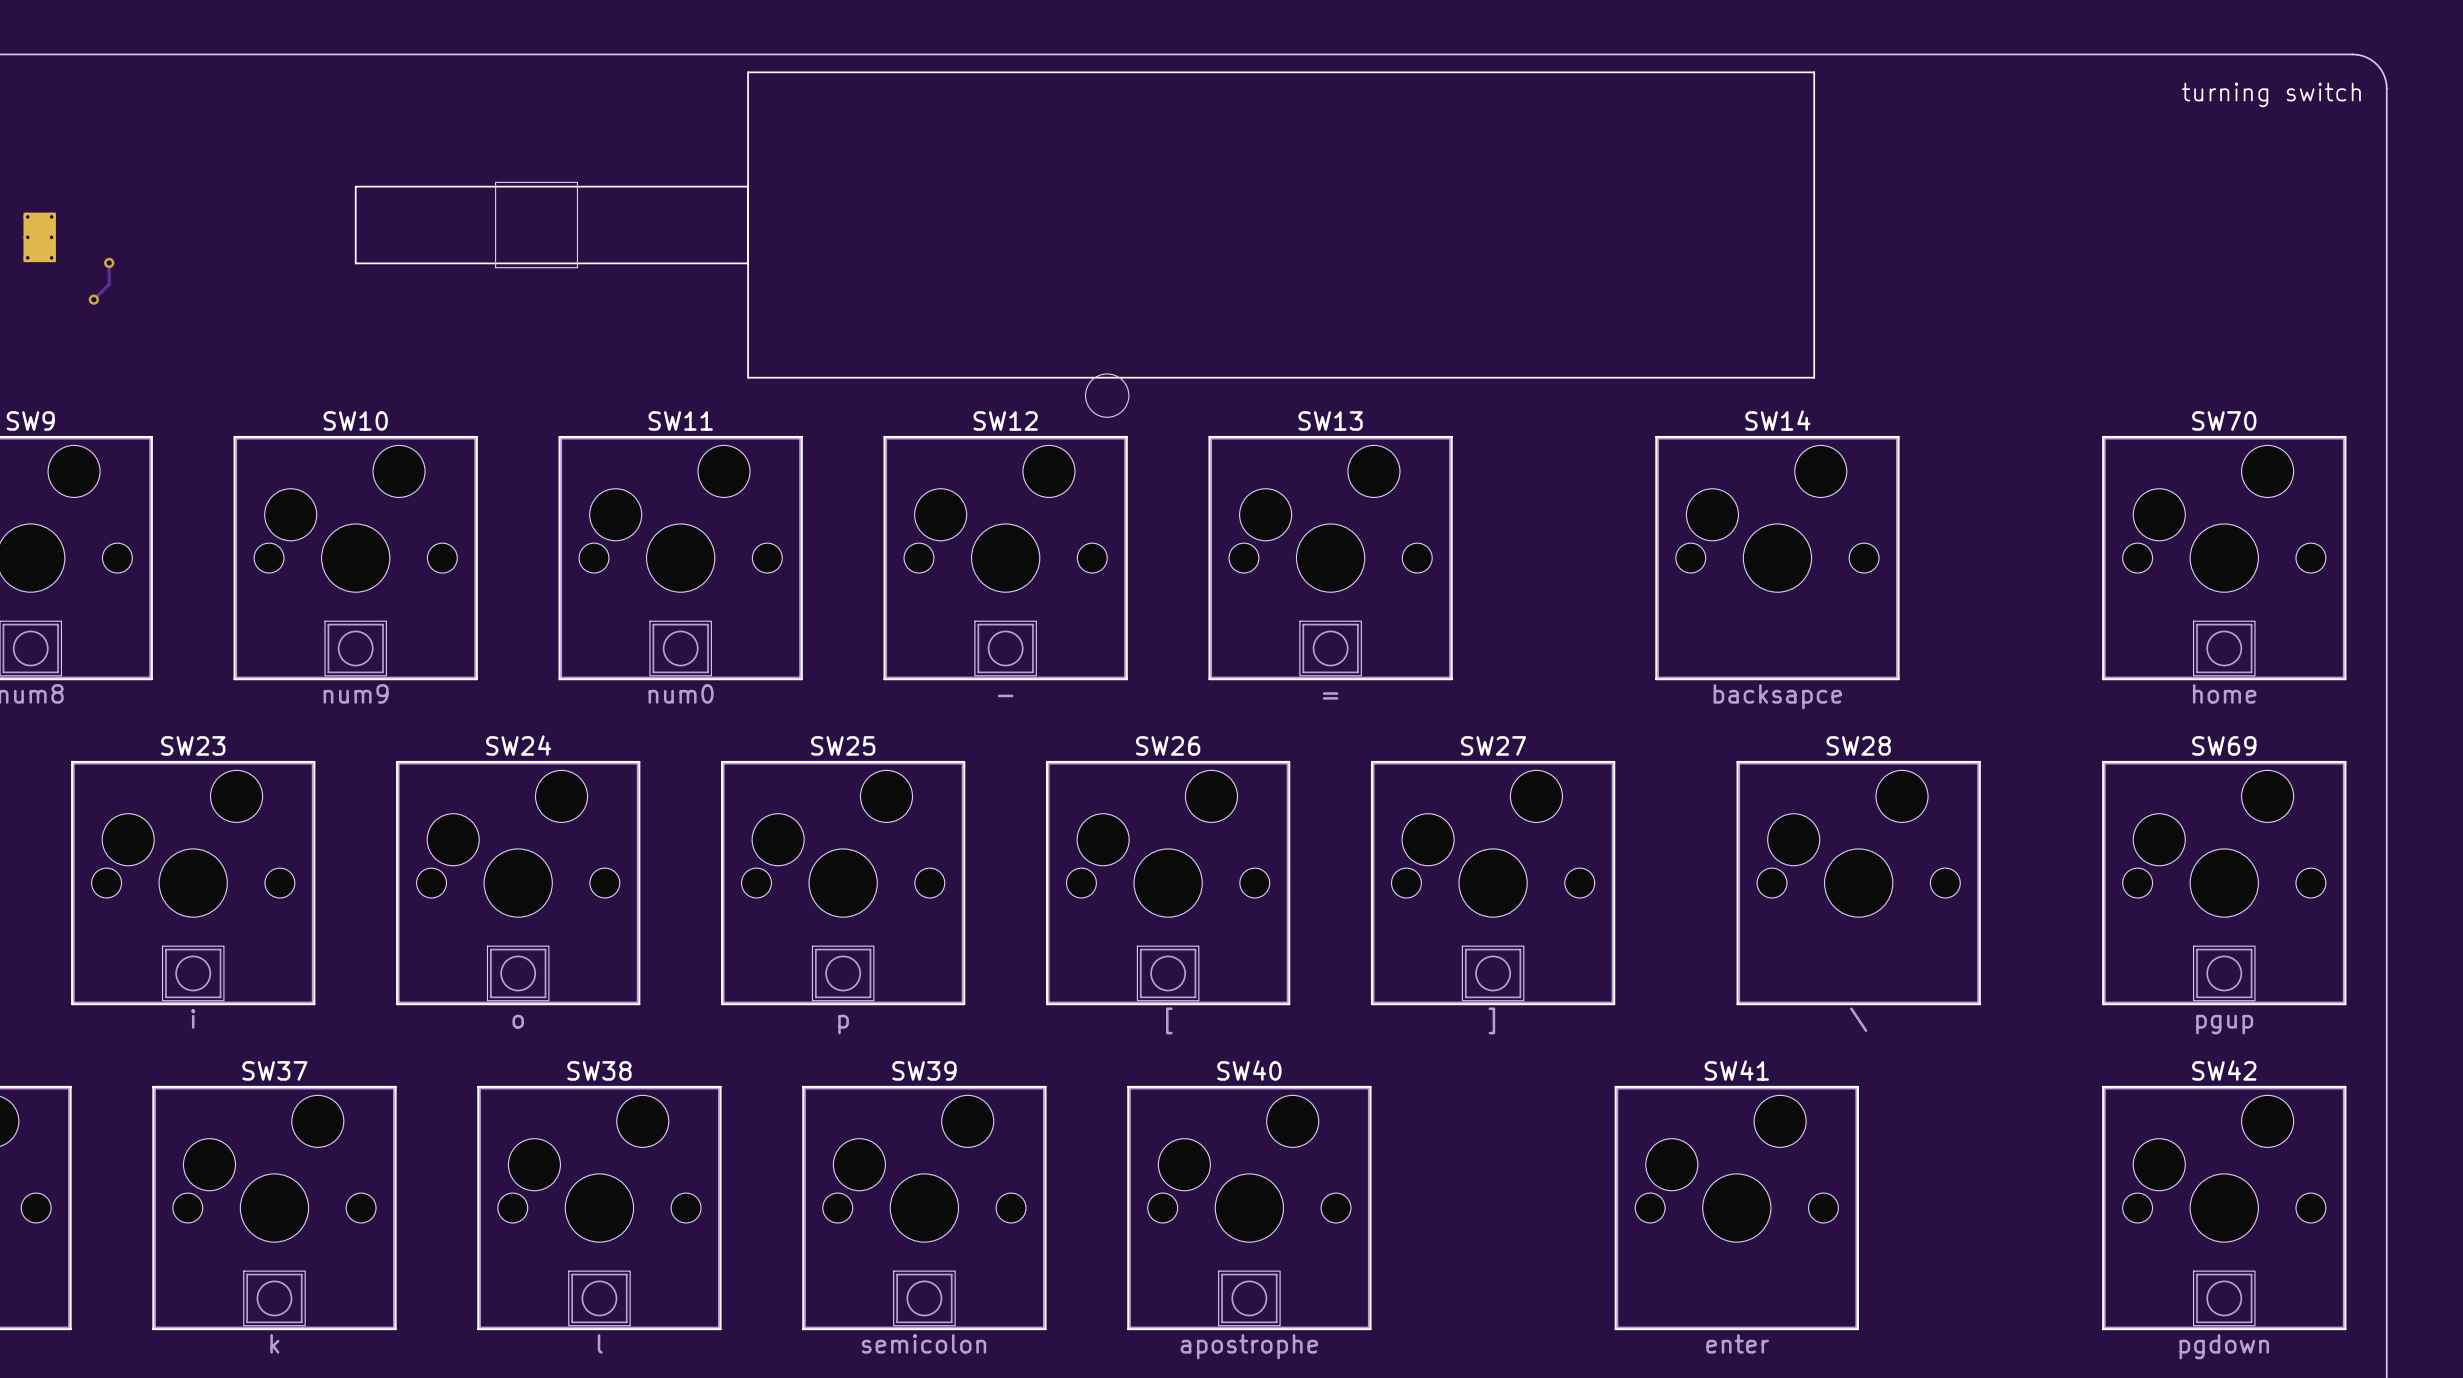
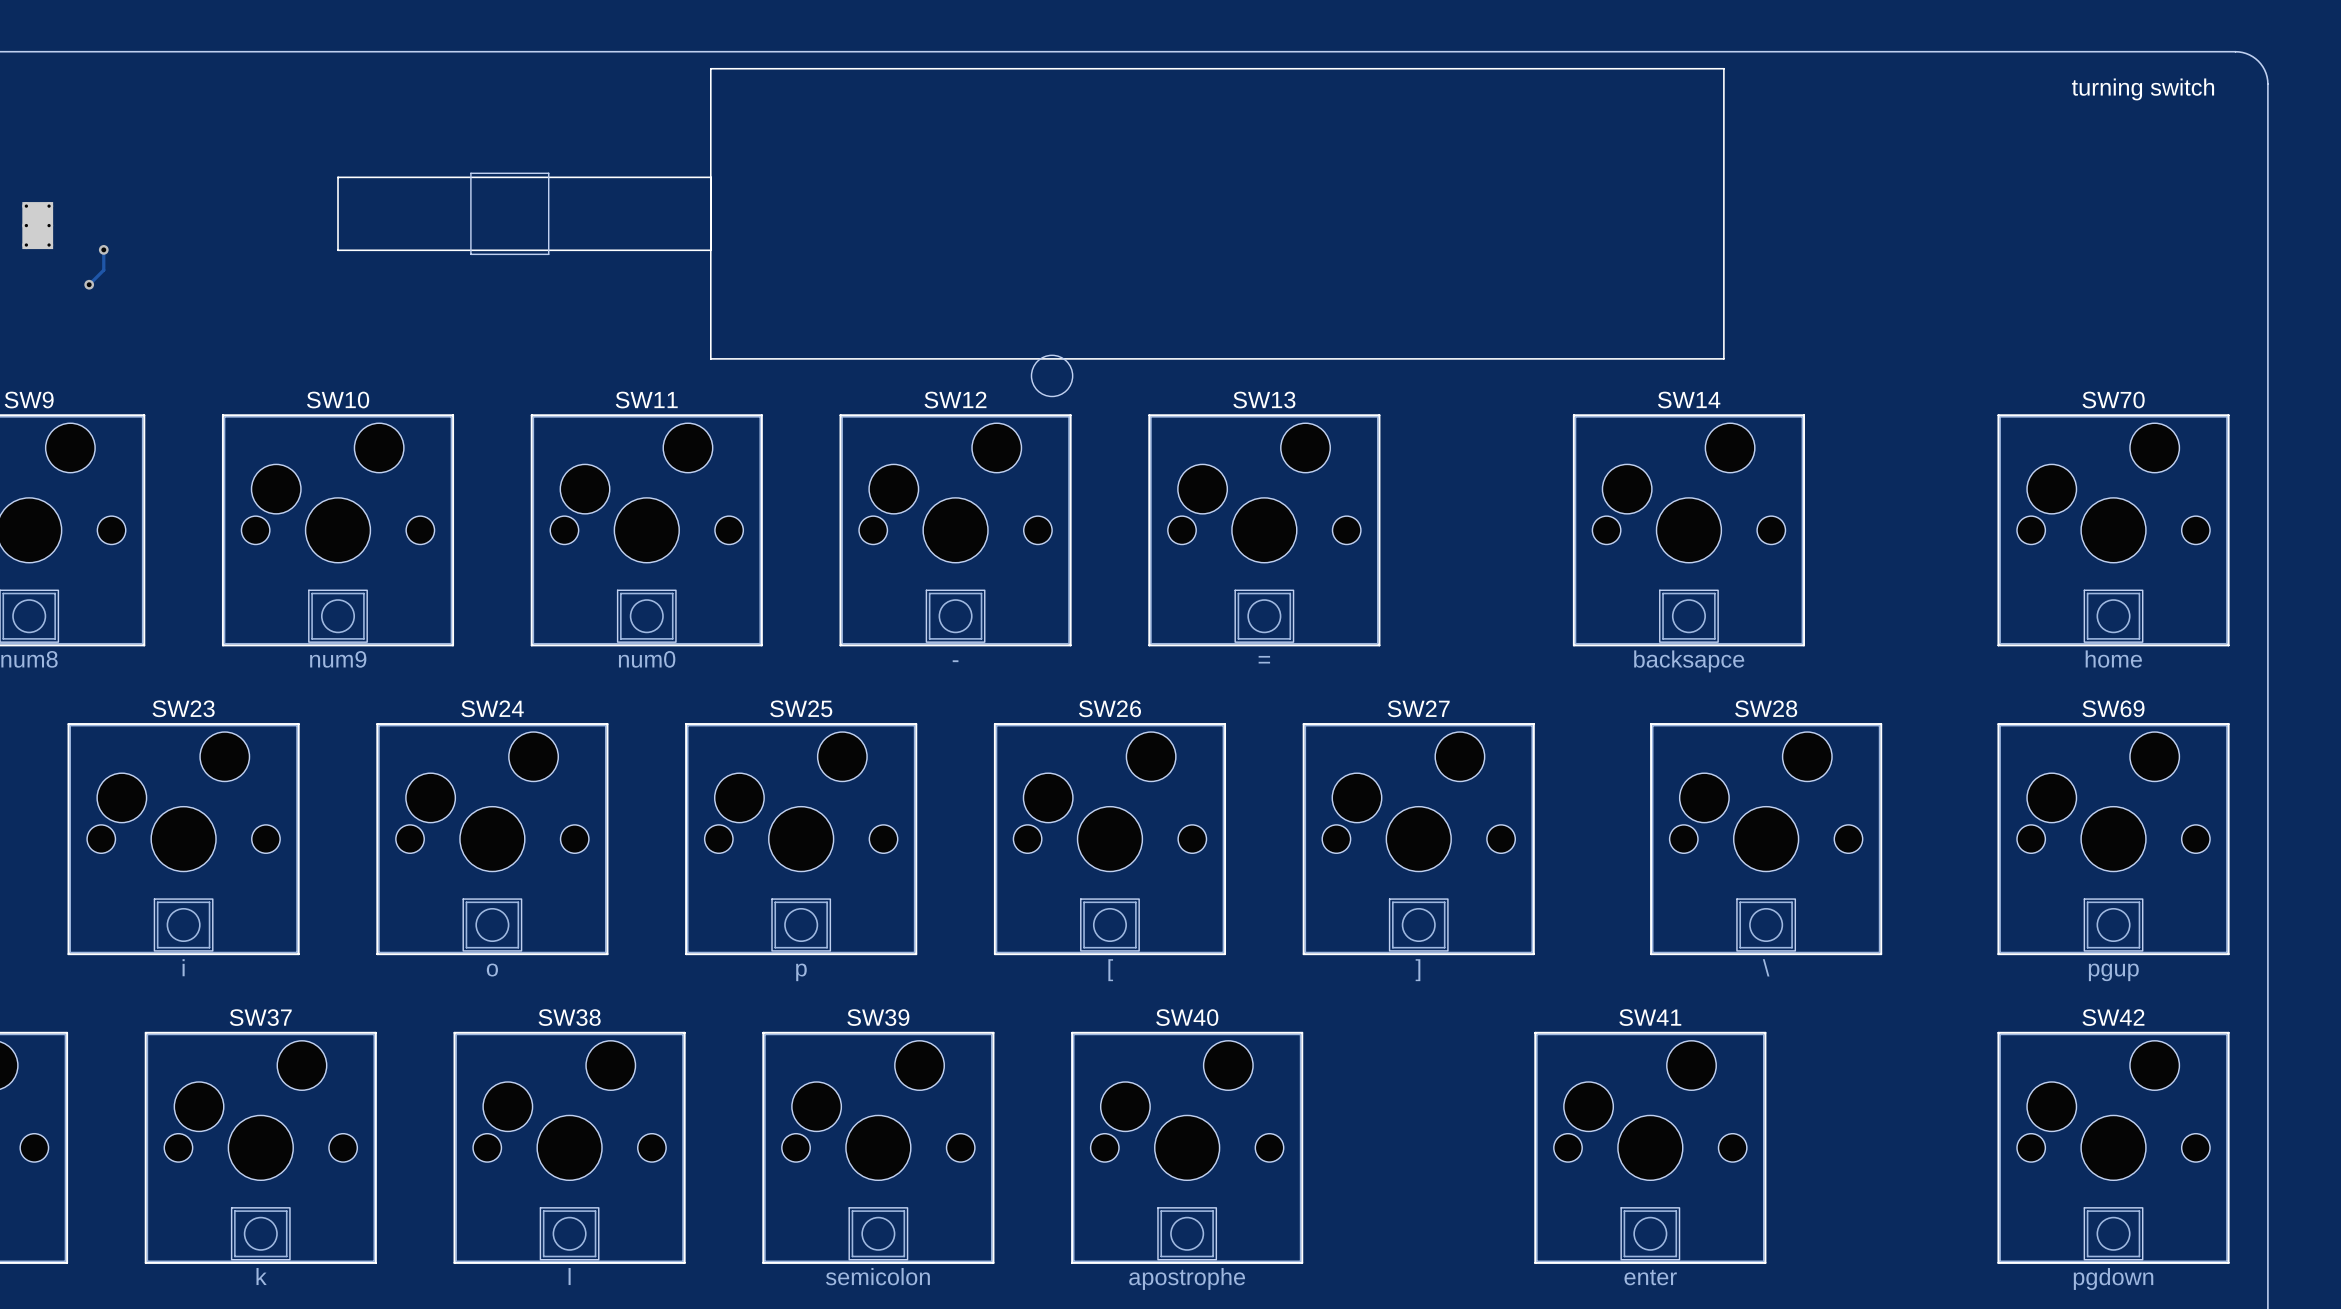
SW14 footprint: [1655, 435, 1900, 681] -> [1572, 414, 1806, 647]
SW28 footprint: [1736, 760, 1981, 1006] -> [1650, 723, 1883, 956]
SW41 footprint: [1614, 1085, 1859, 1331] -> [1534, 1031, 1767, 1264]

